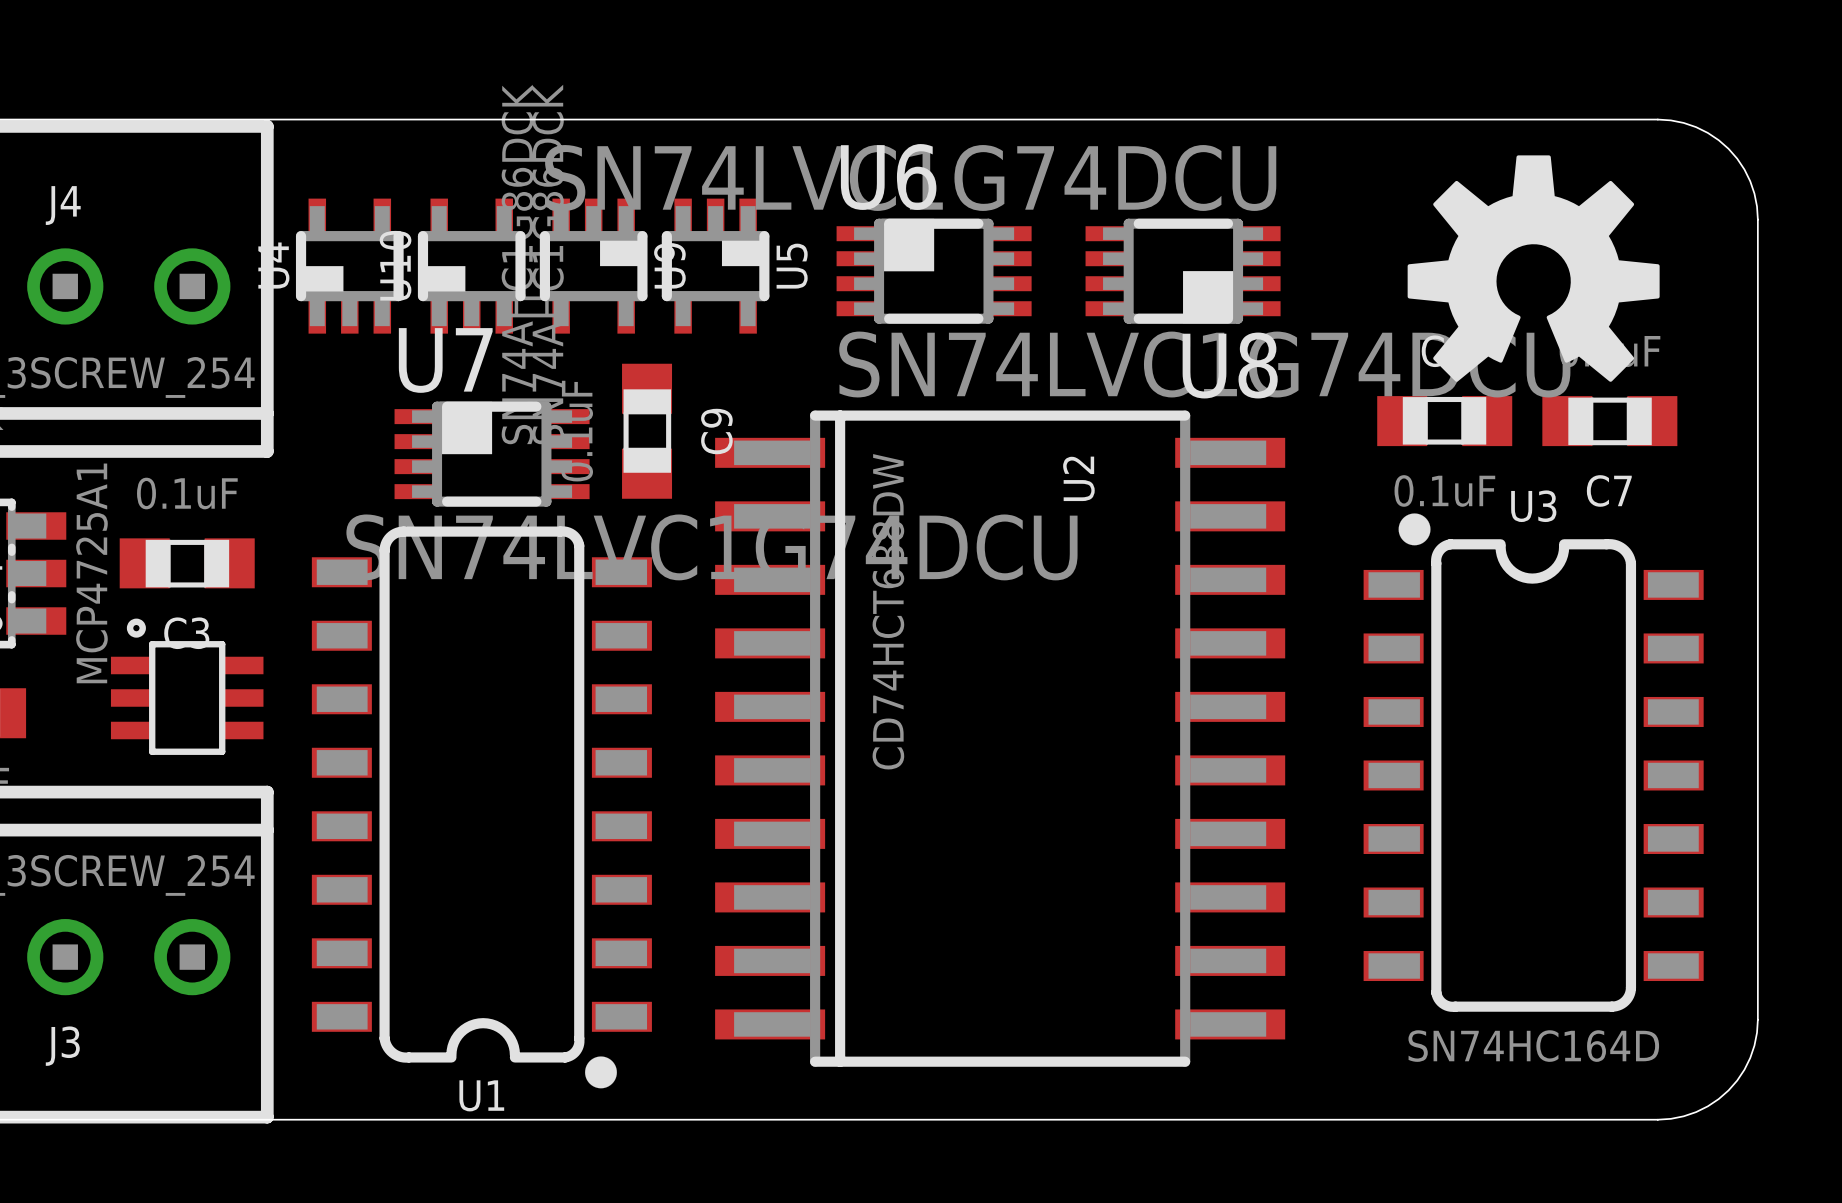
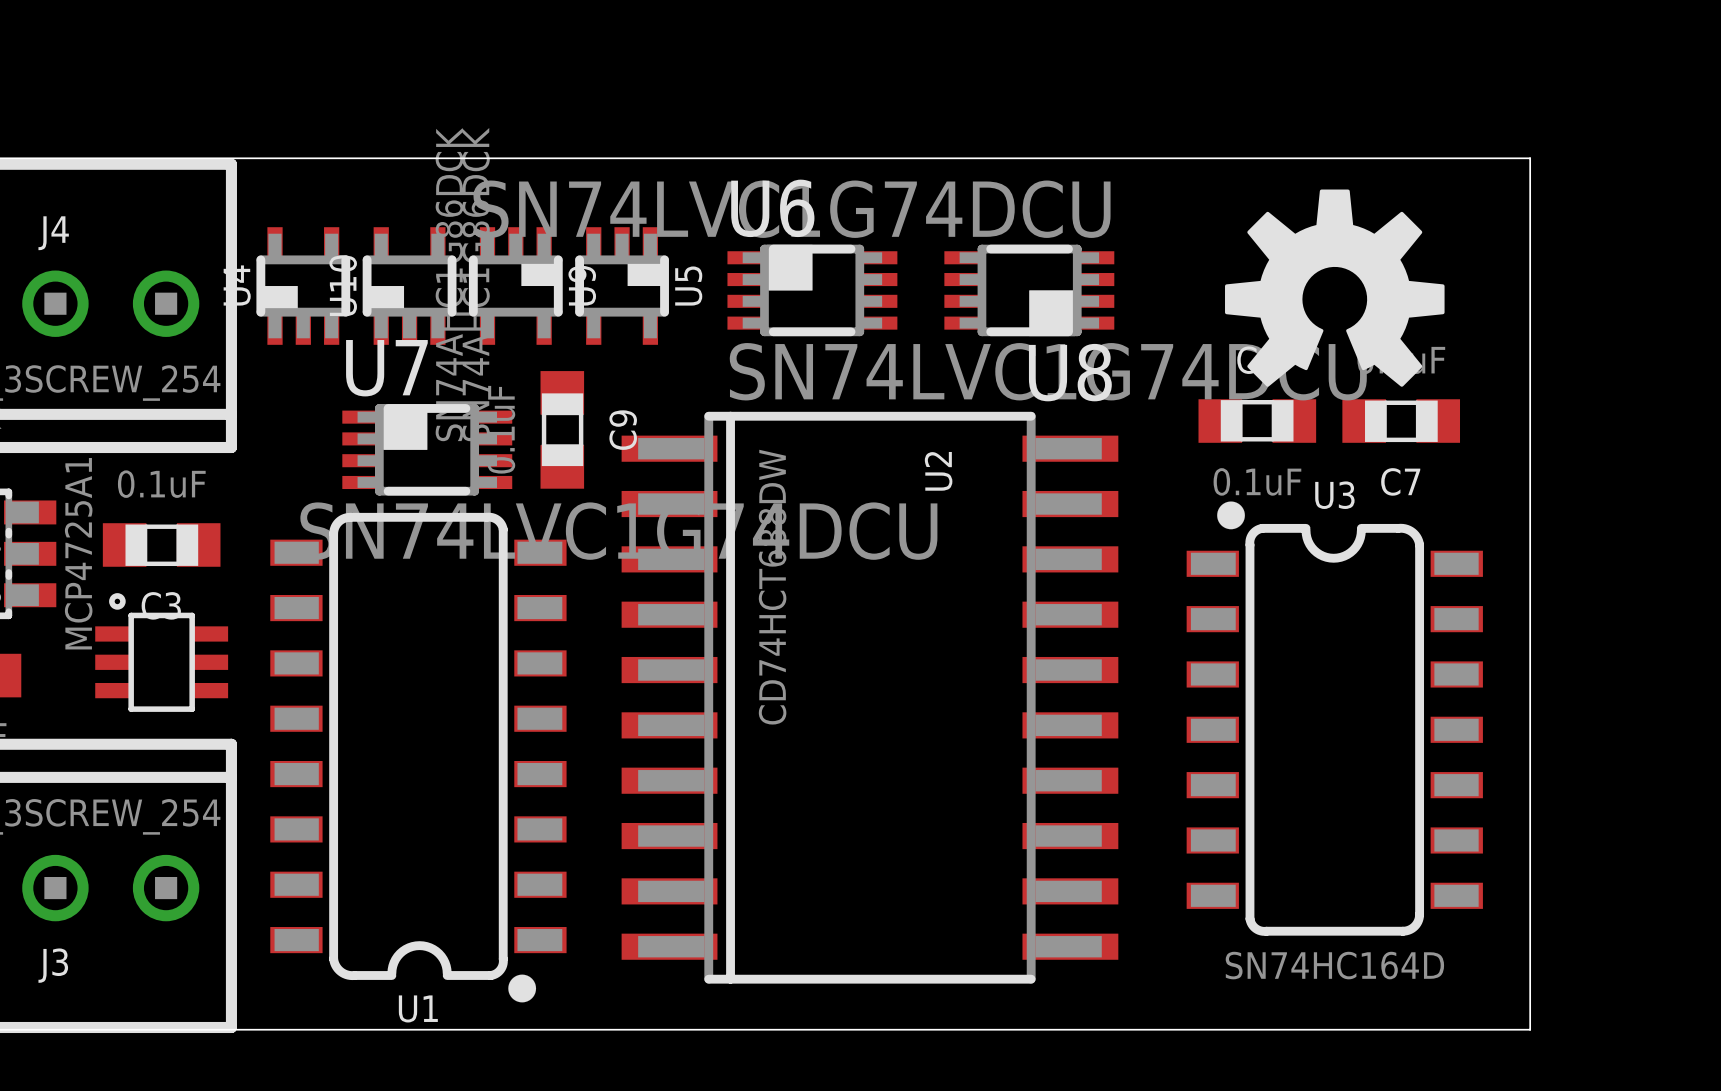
board edge: (1657, 119) (1683, 122) (1696, 127) (1707, 132) (1728, 148) (1744, 169) (1750, 181) (1754, 193) (1757, 219) -> (1443, 158) (1530, 158) (1530, 245)
board edge: (1757, 1019) (1754, 1045) (1750, 1057) (1744, 1069) (1728, 1090) (1707, 1106) (1696, 1112) (1683, 1116) (1657, 1119) -> (1530, 942) (1530, 1029) (1443, 1029)

